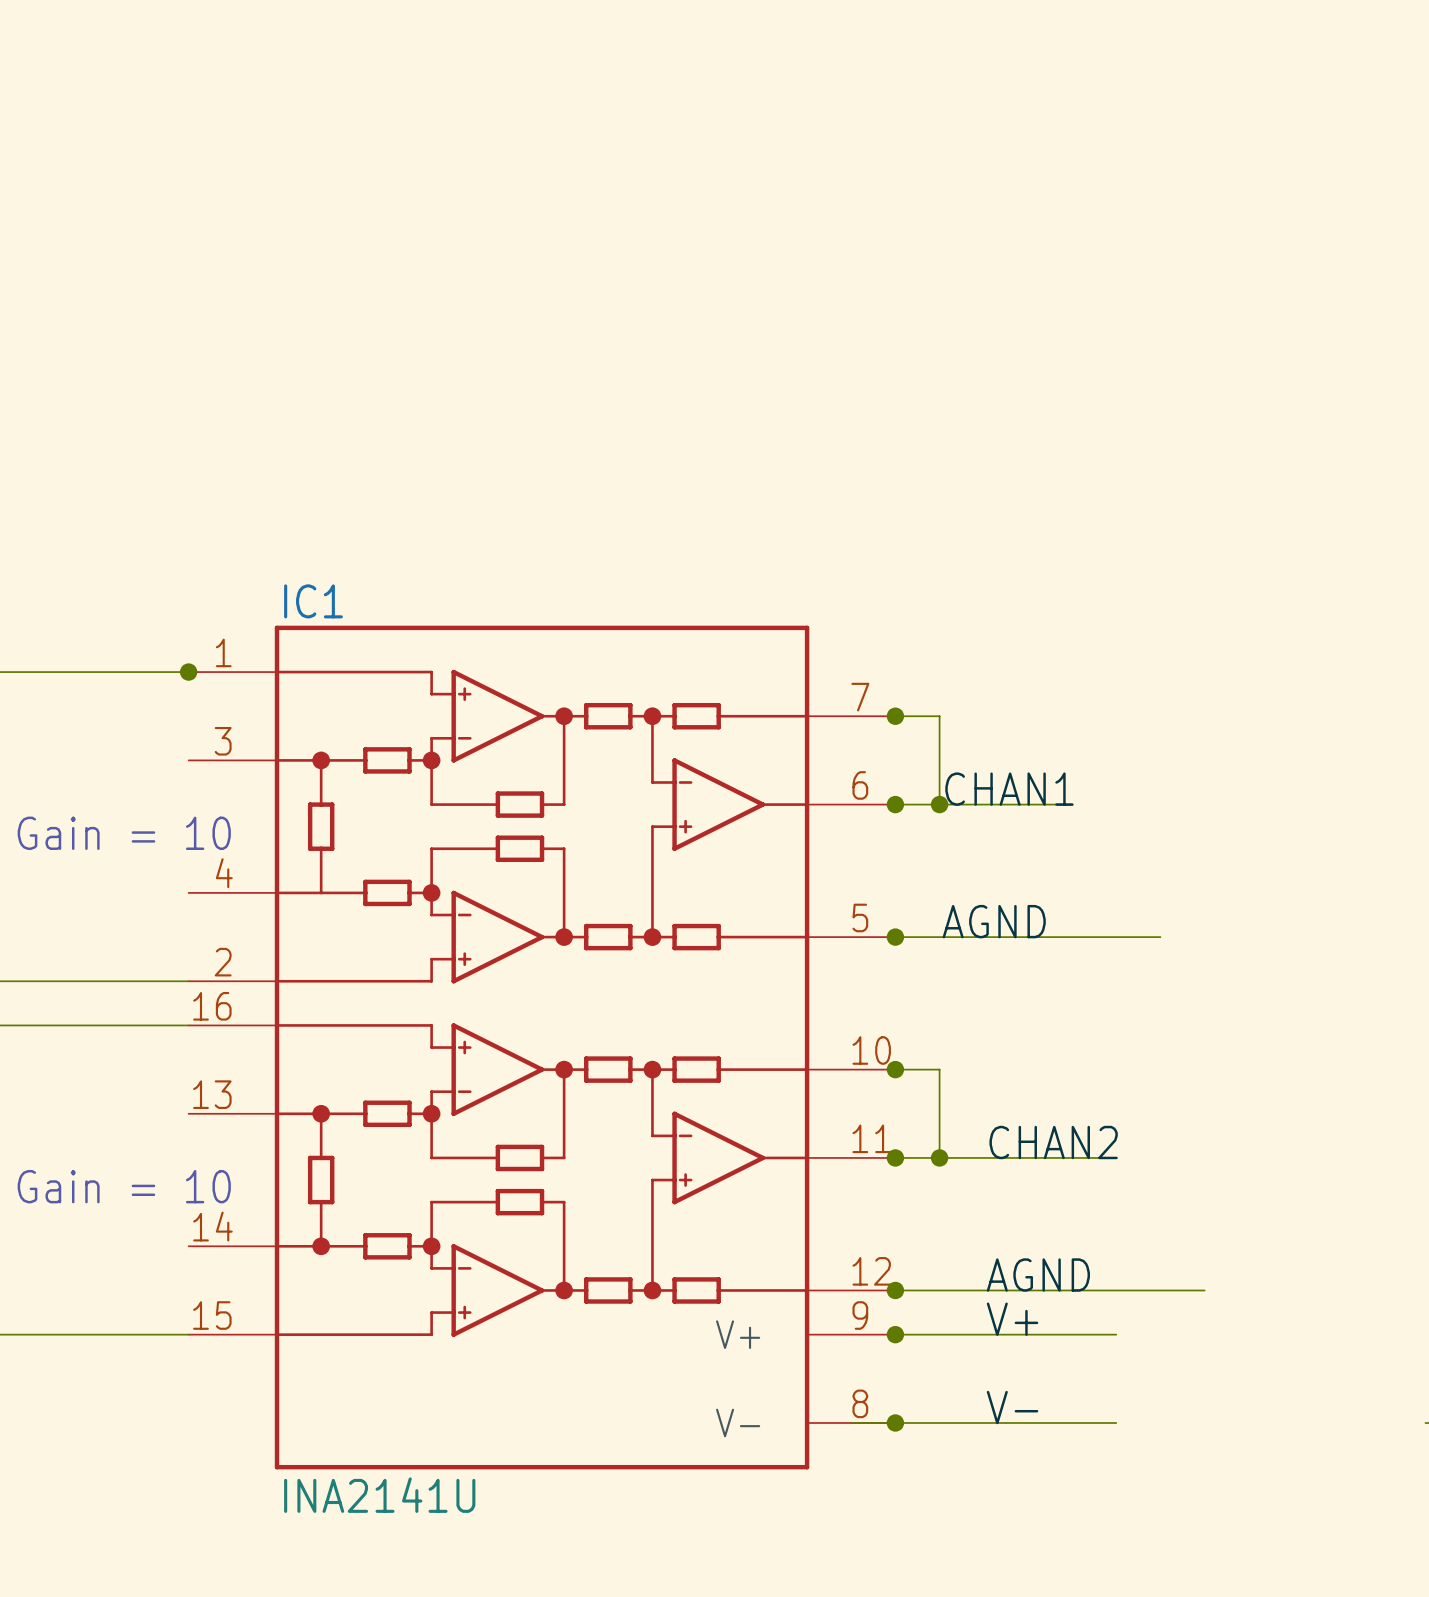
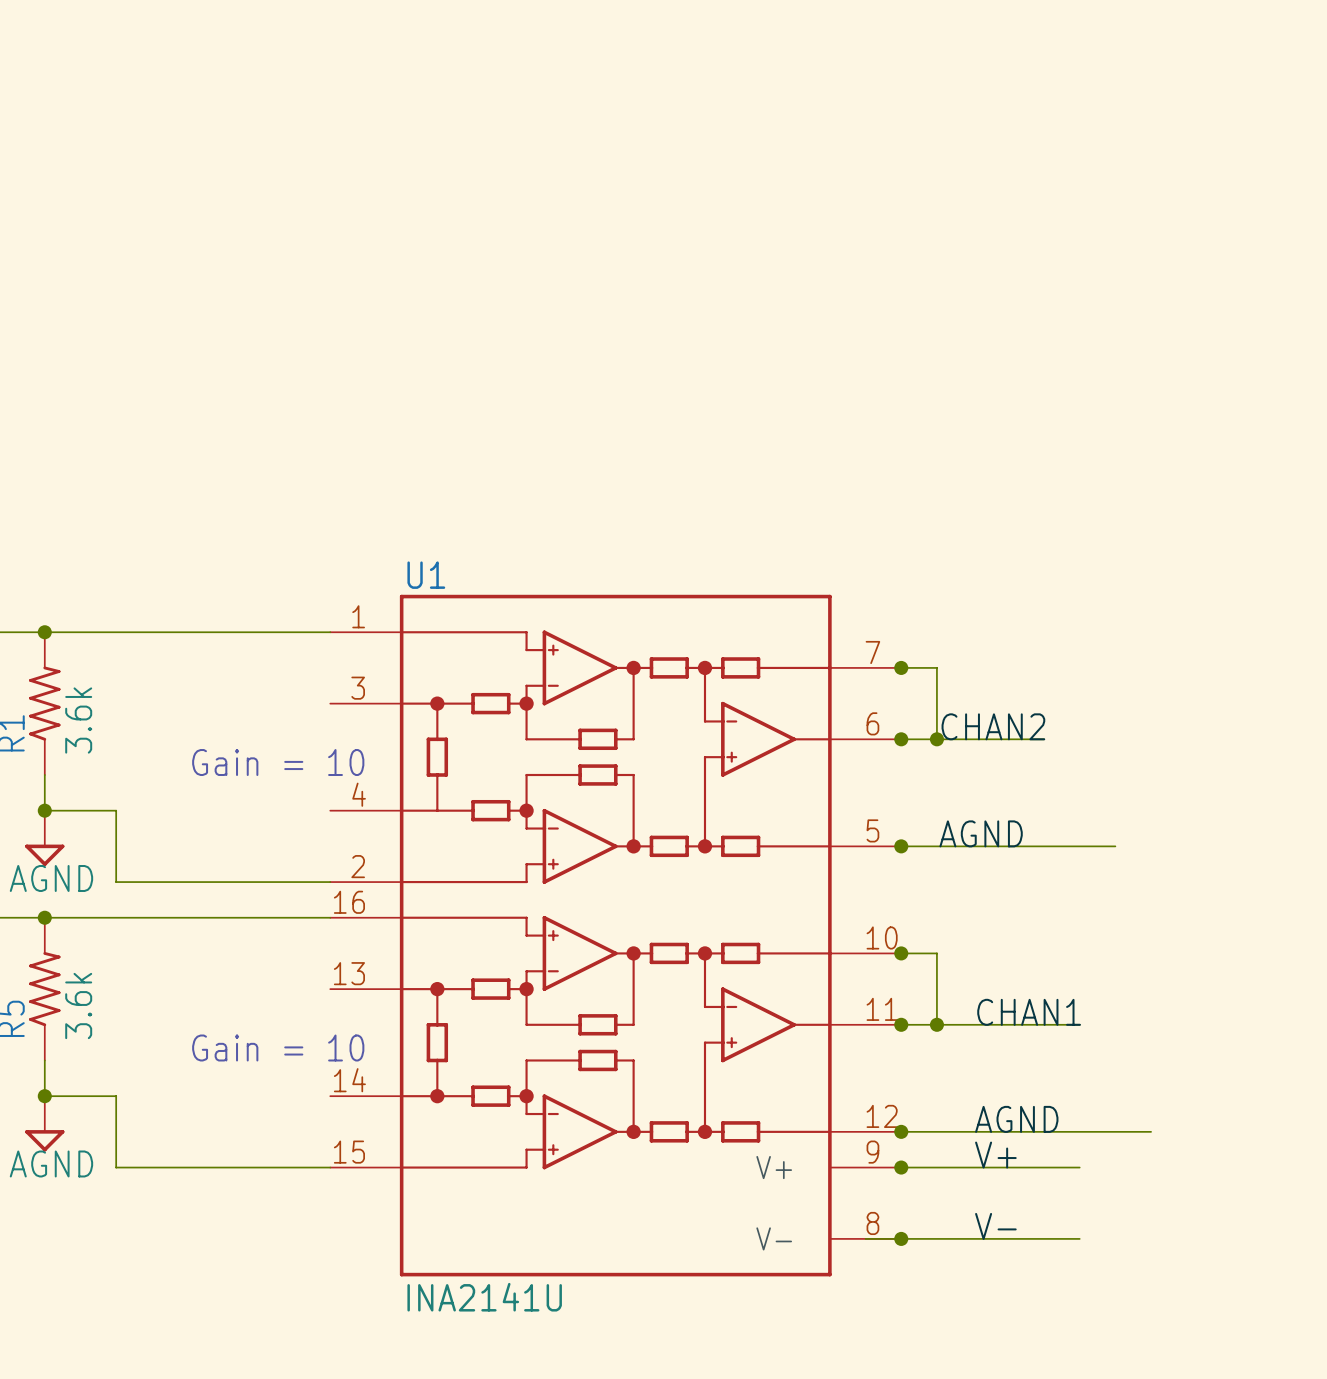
IC1 name: IC1 (313, 601) -> U1 (426, 575)
junction: (188, 672) -> none
label: CHAN1 (1009, 789) -> CHAN2 (993, 726)
label: CHAN2 (1053, 1142) -> CHAN1 (1029, 1012)

